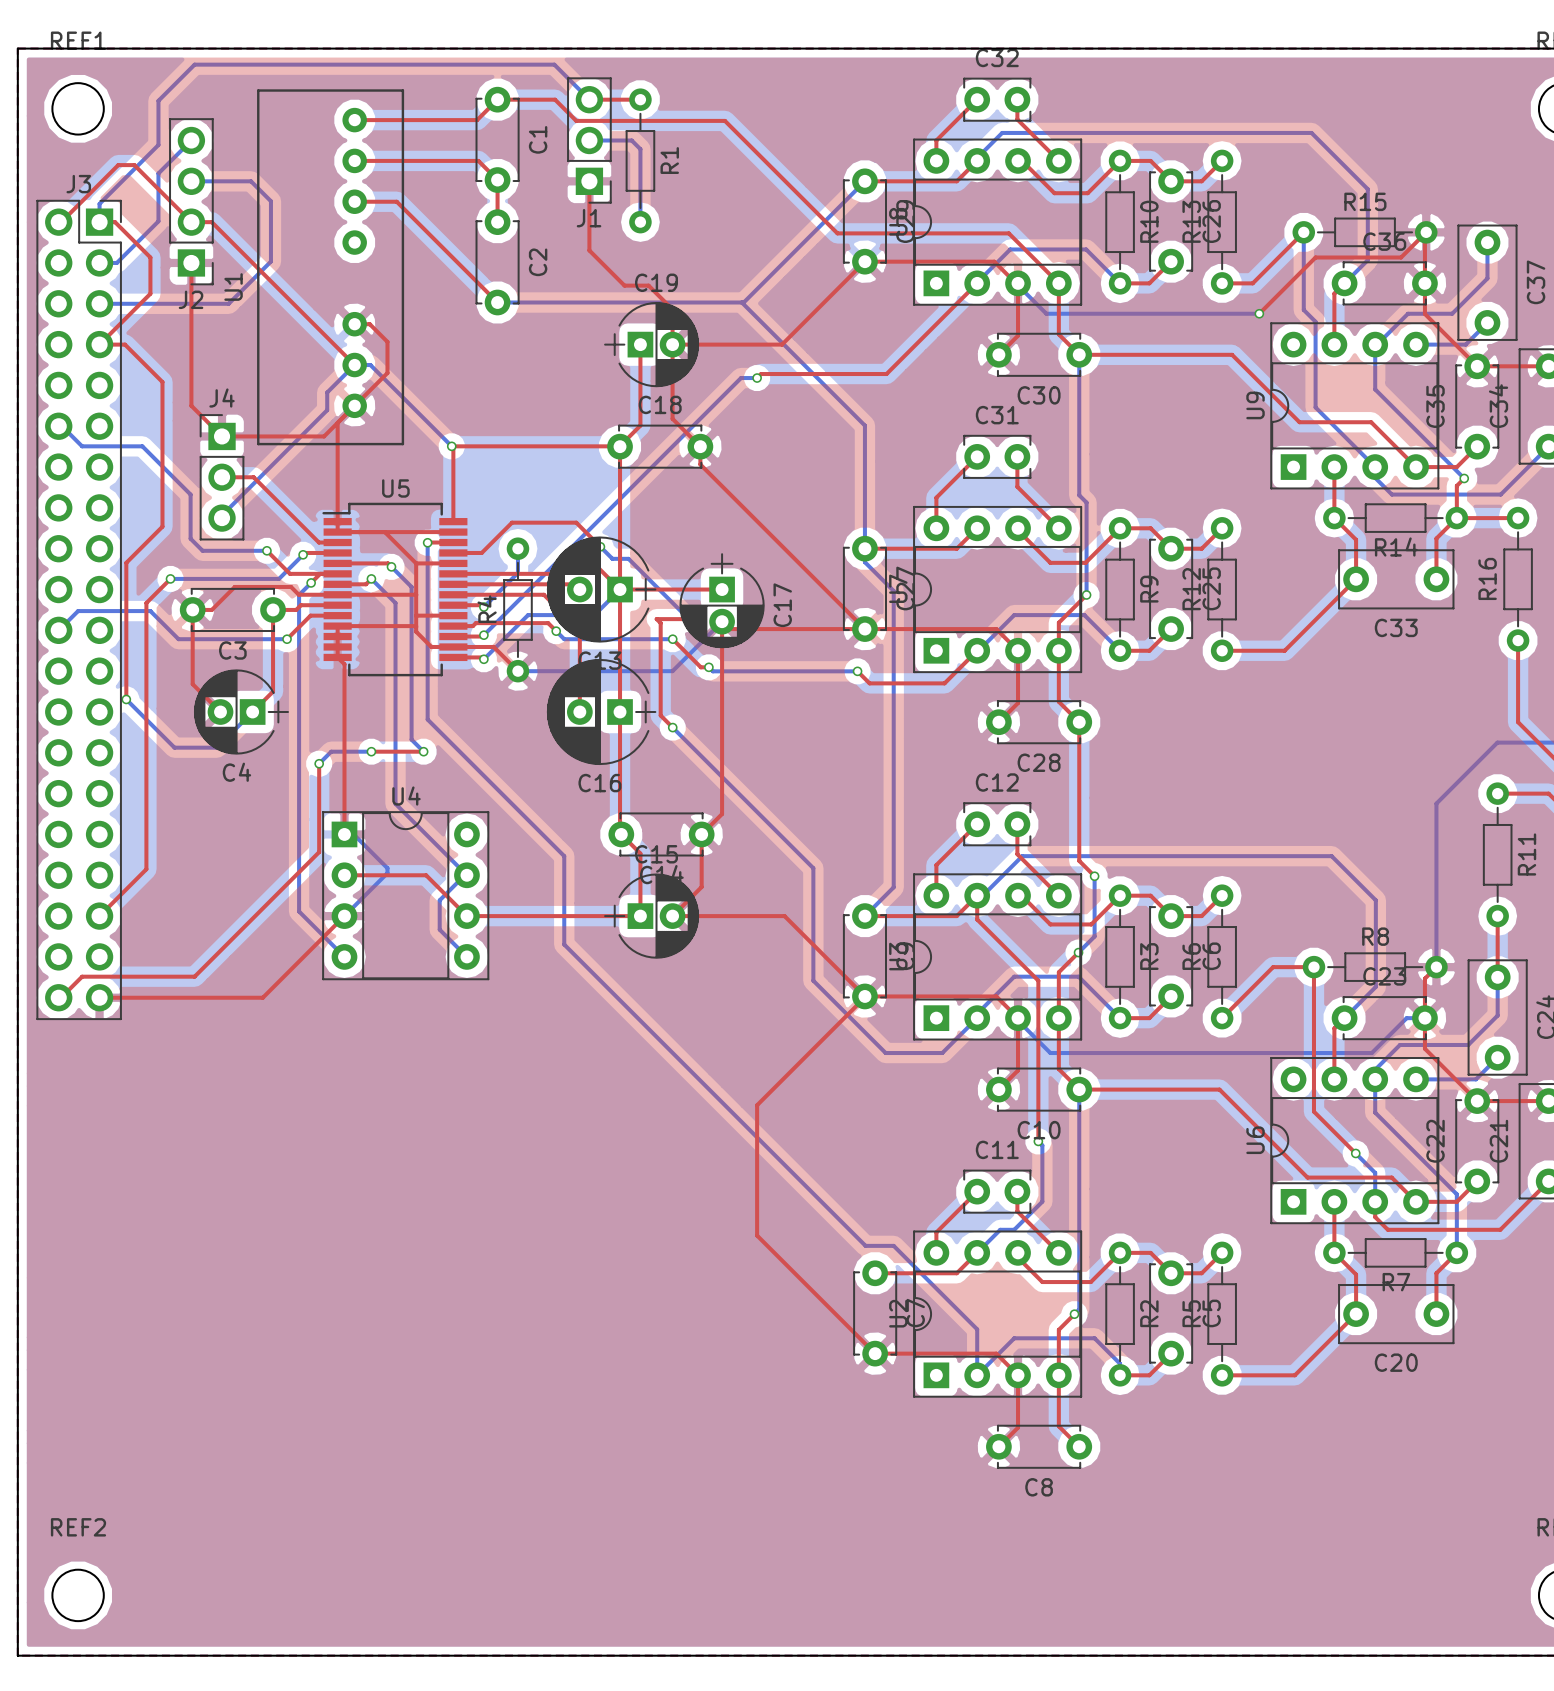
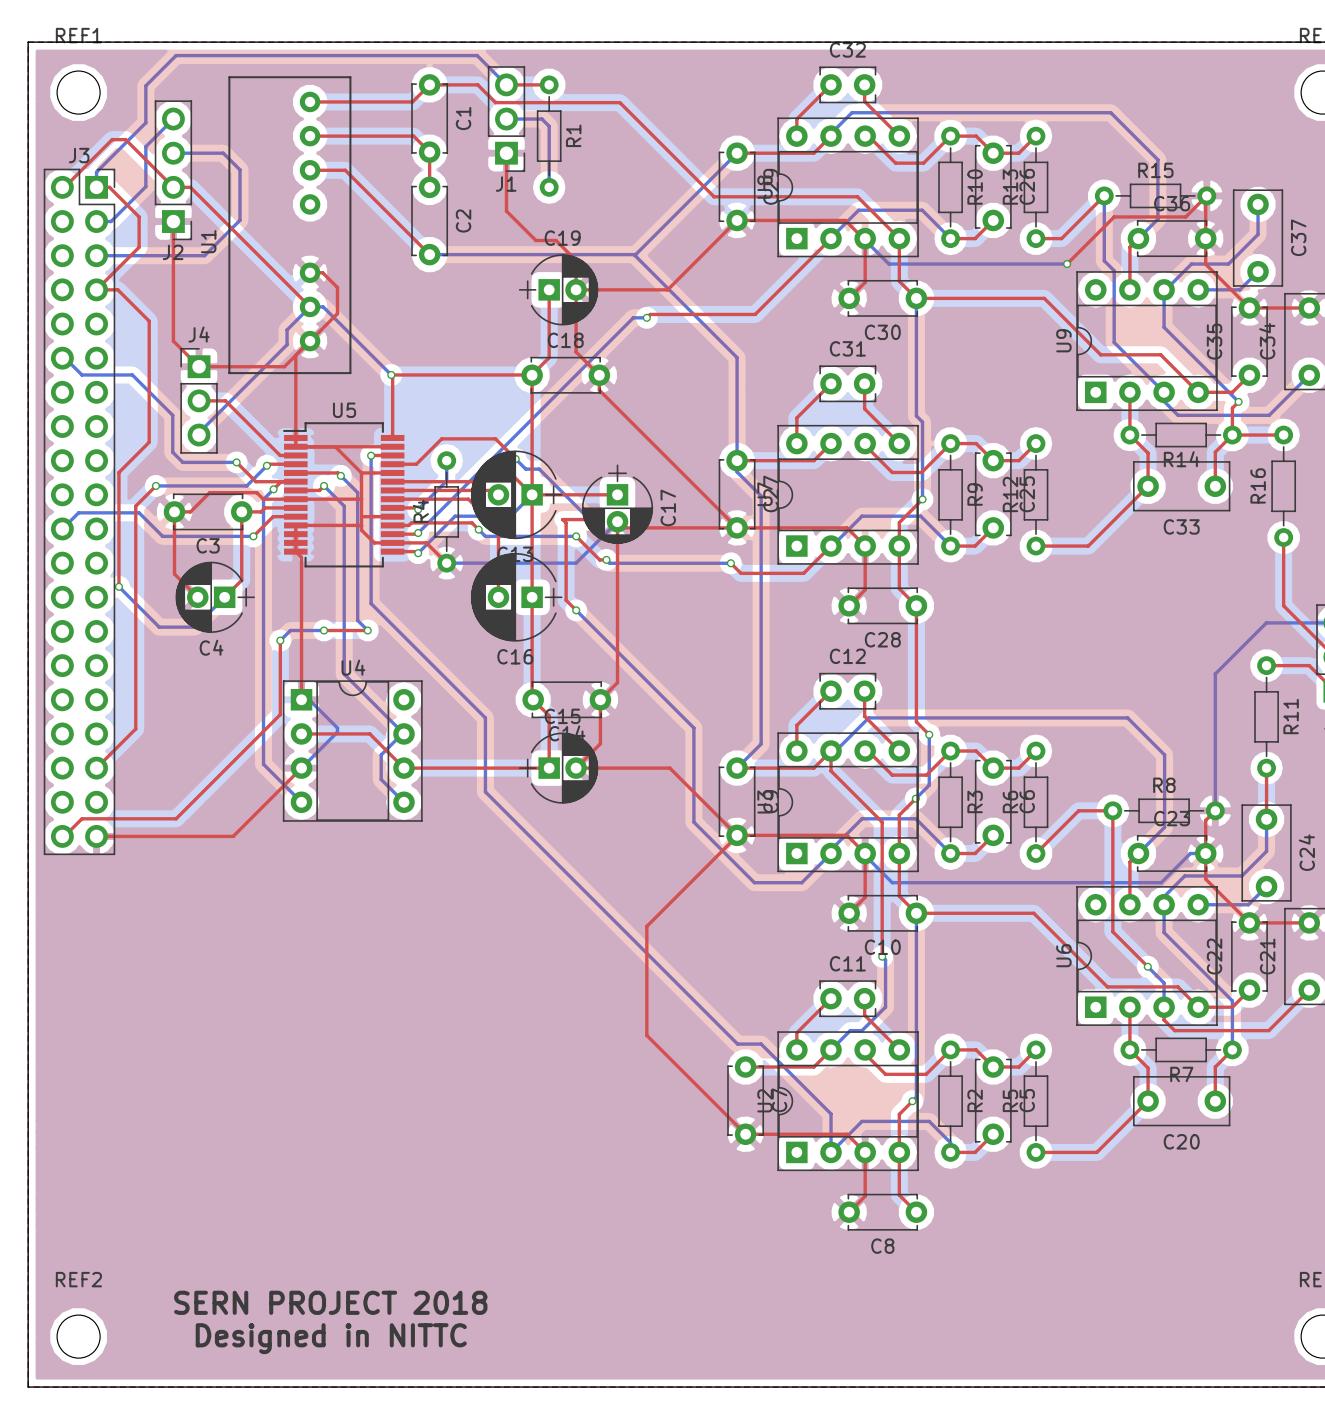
text: none -> SERN PROJECT 2018 (330, 1302)
text: none -> Designed in NITTC (331, 1338)

